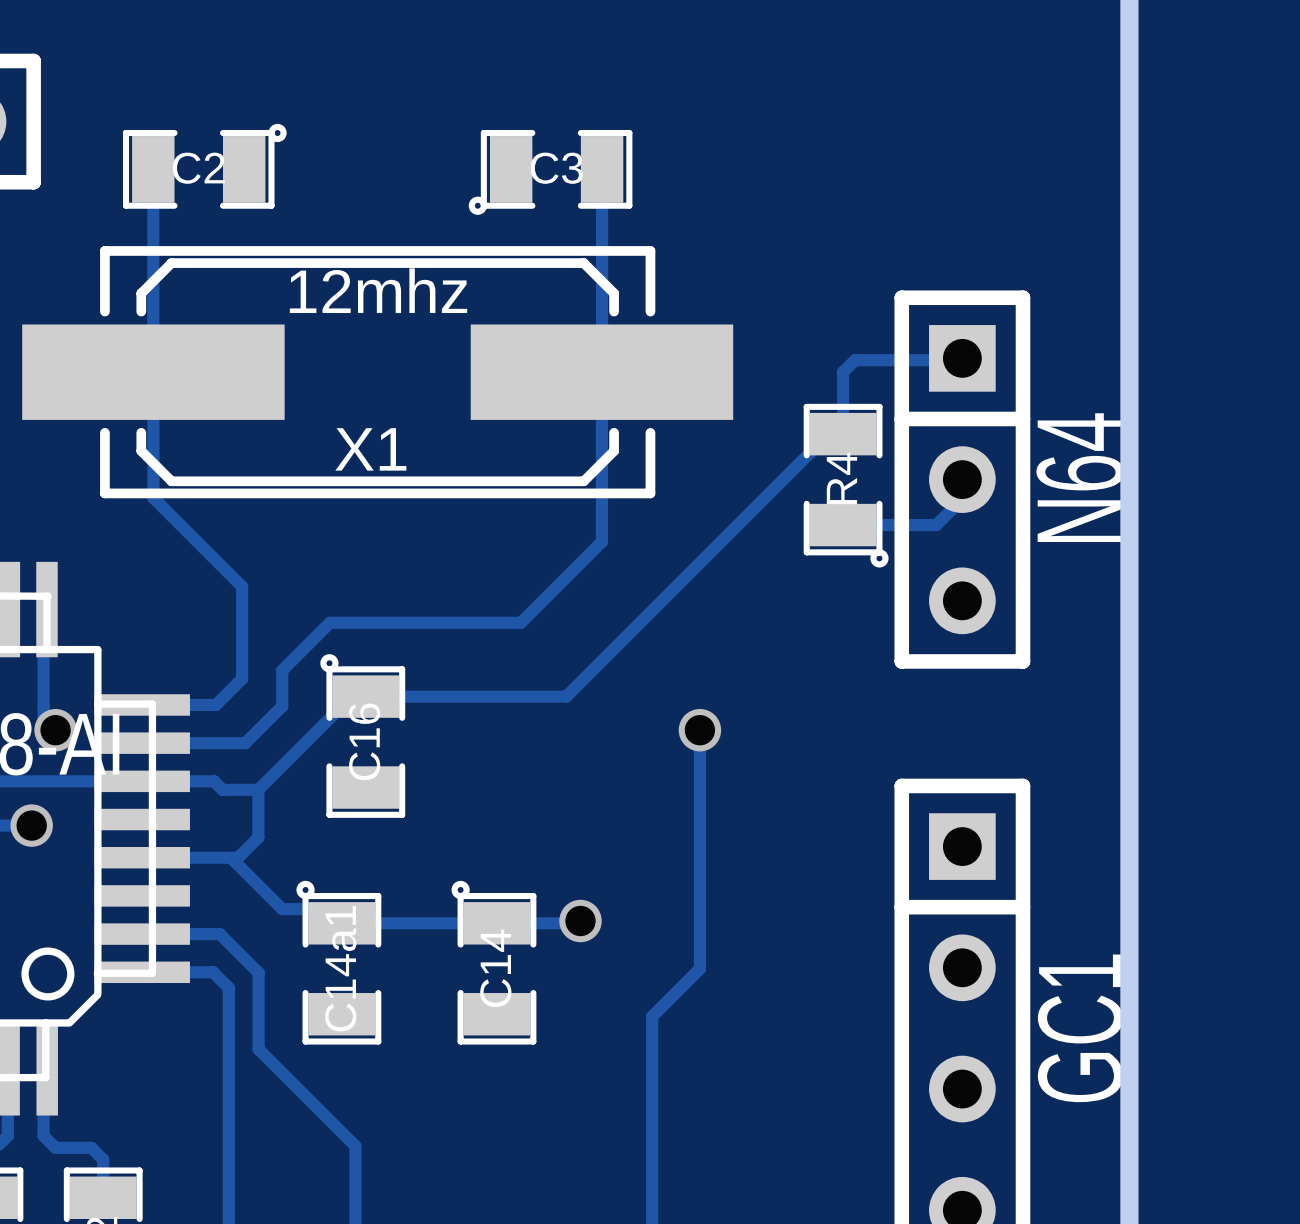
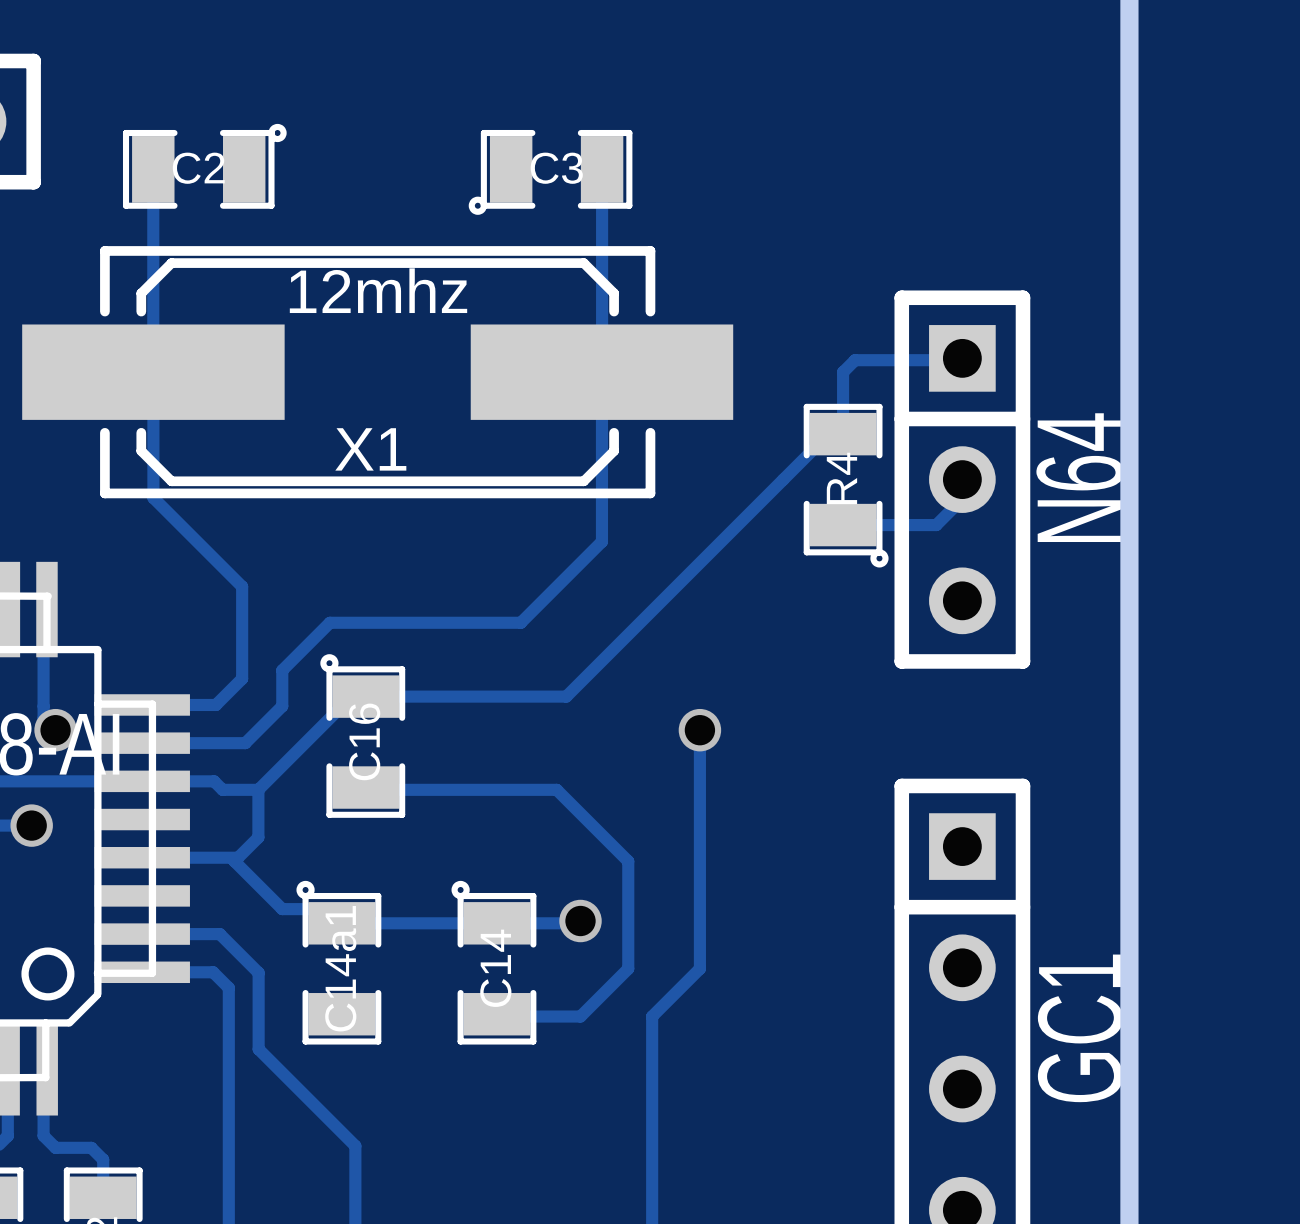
track: none -> (365, 787) (368, 789) (556, 789) (628, 861) (628, 968) (580, 1016) (499, 1016) (496, 1014)

